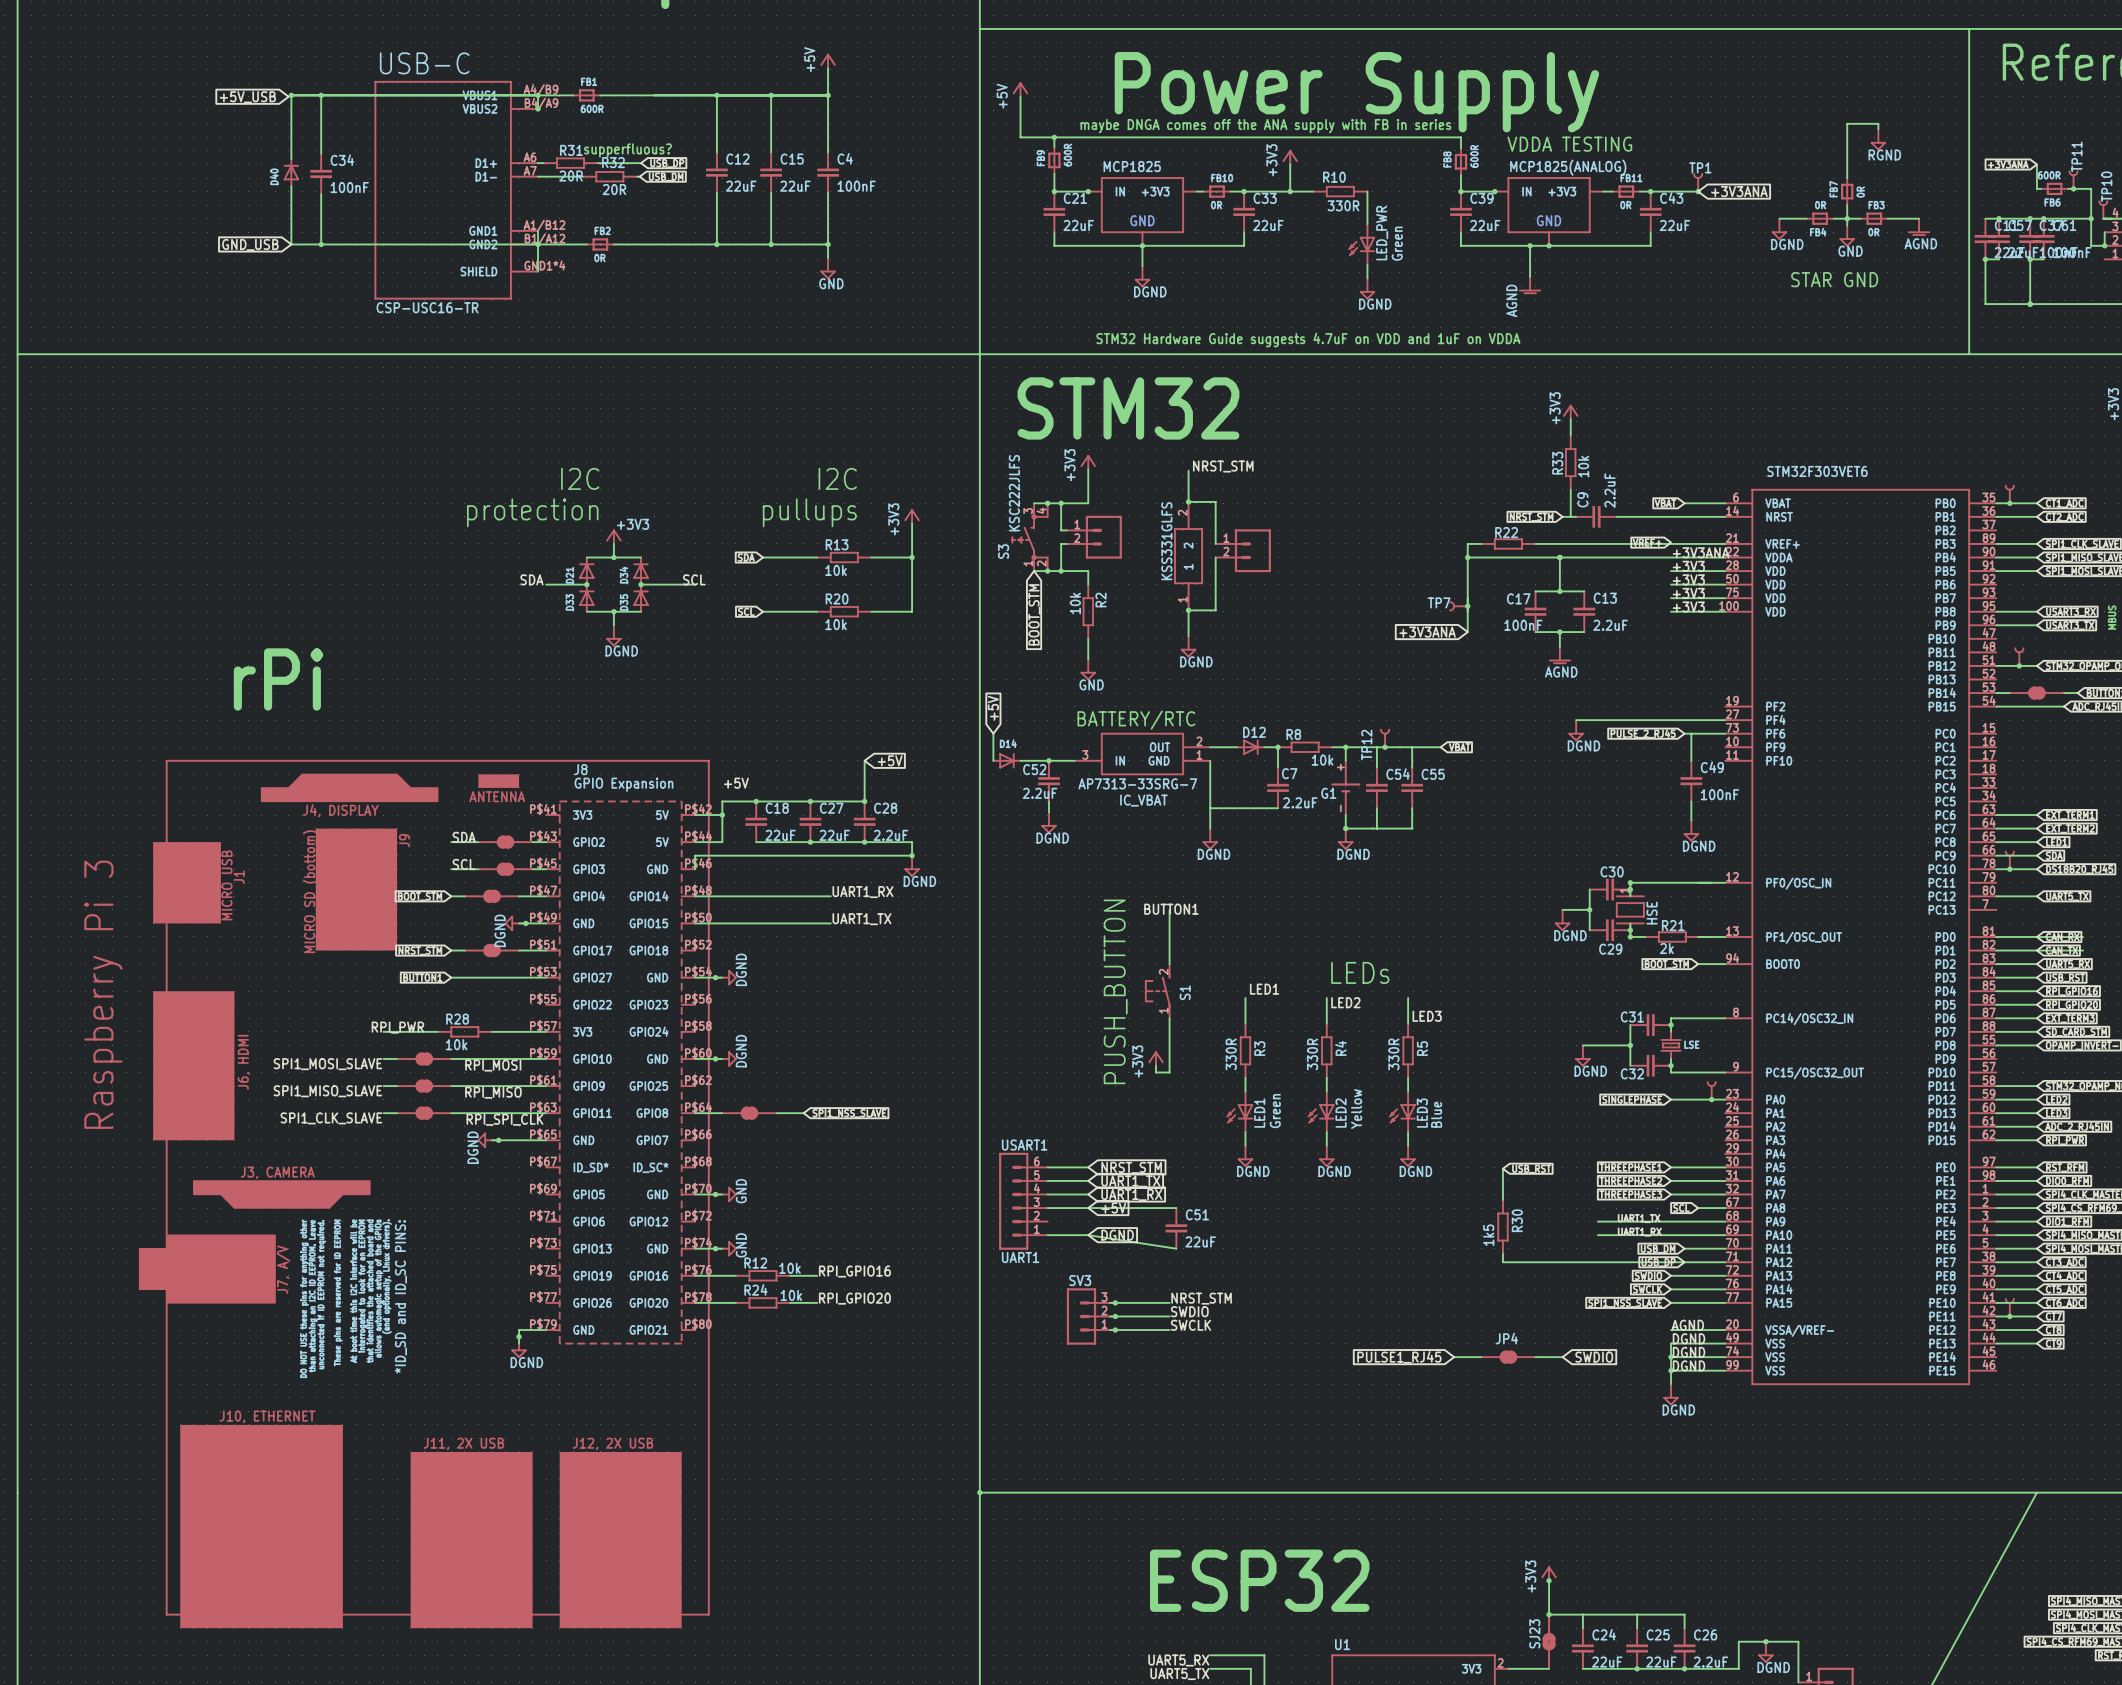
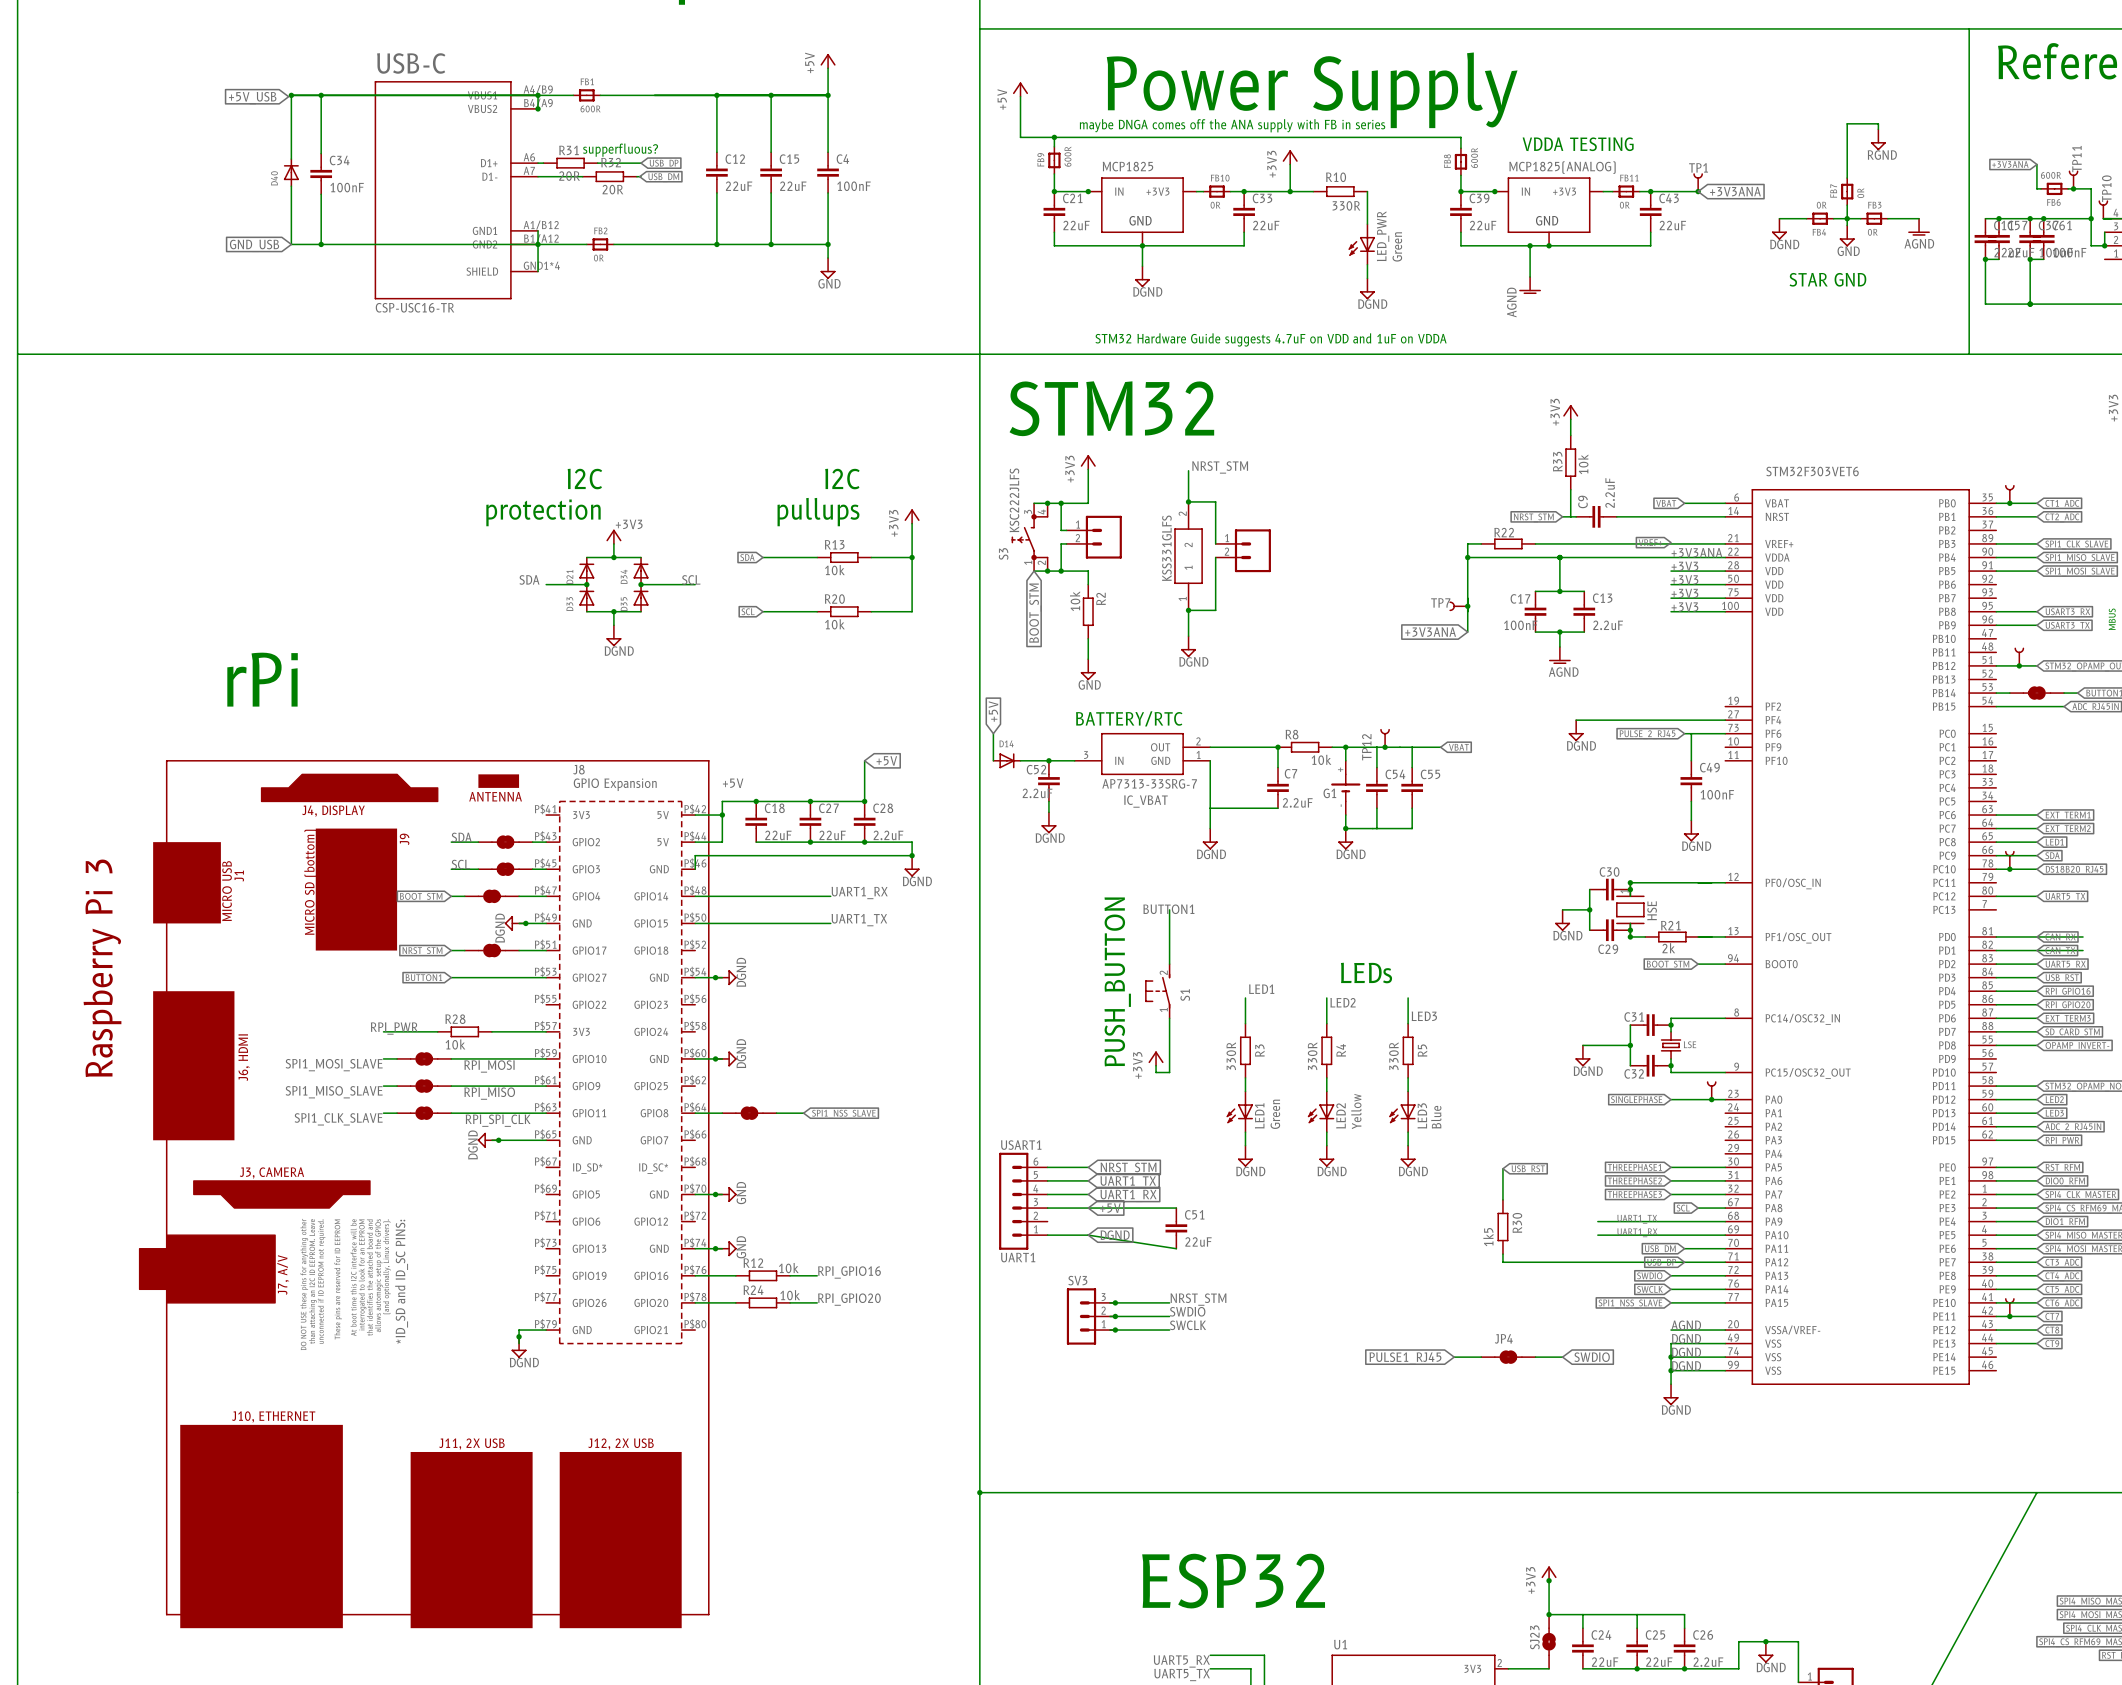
D12: (1250, 747) -> none

